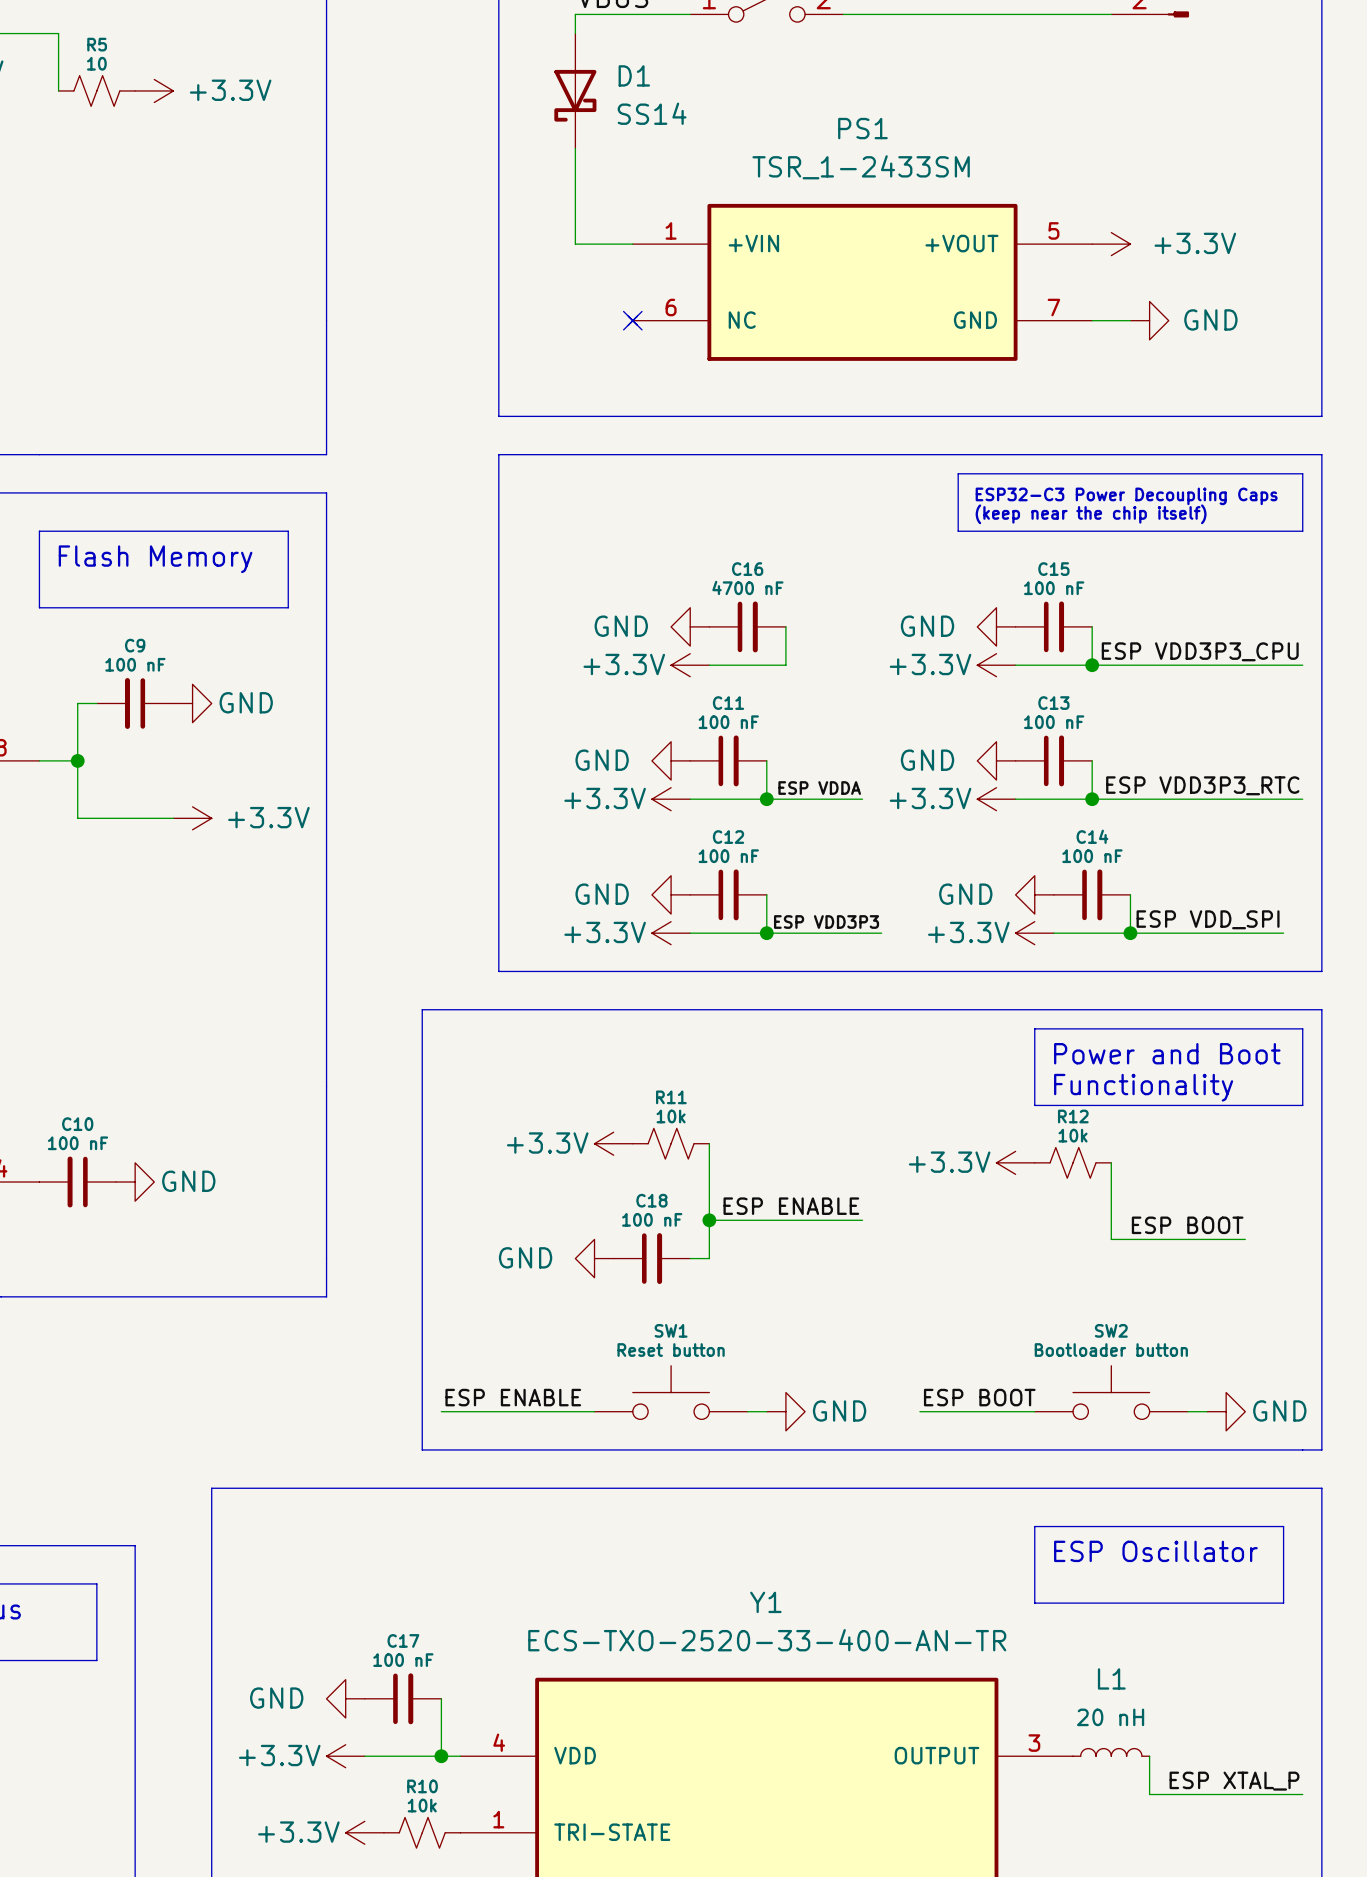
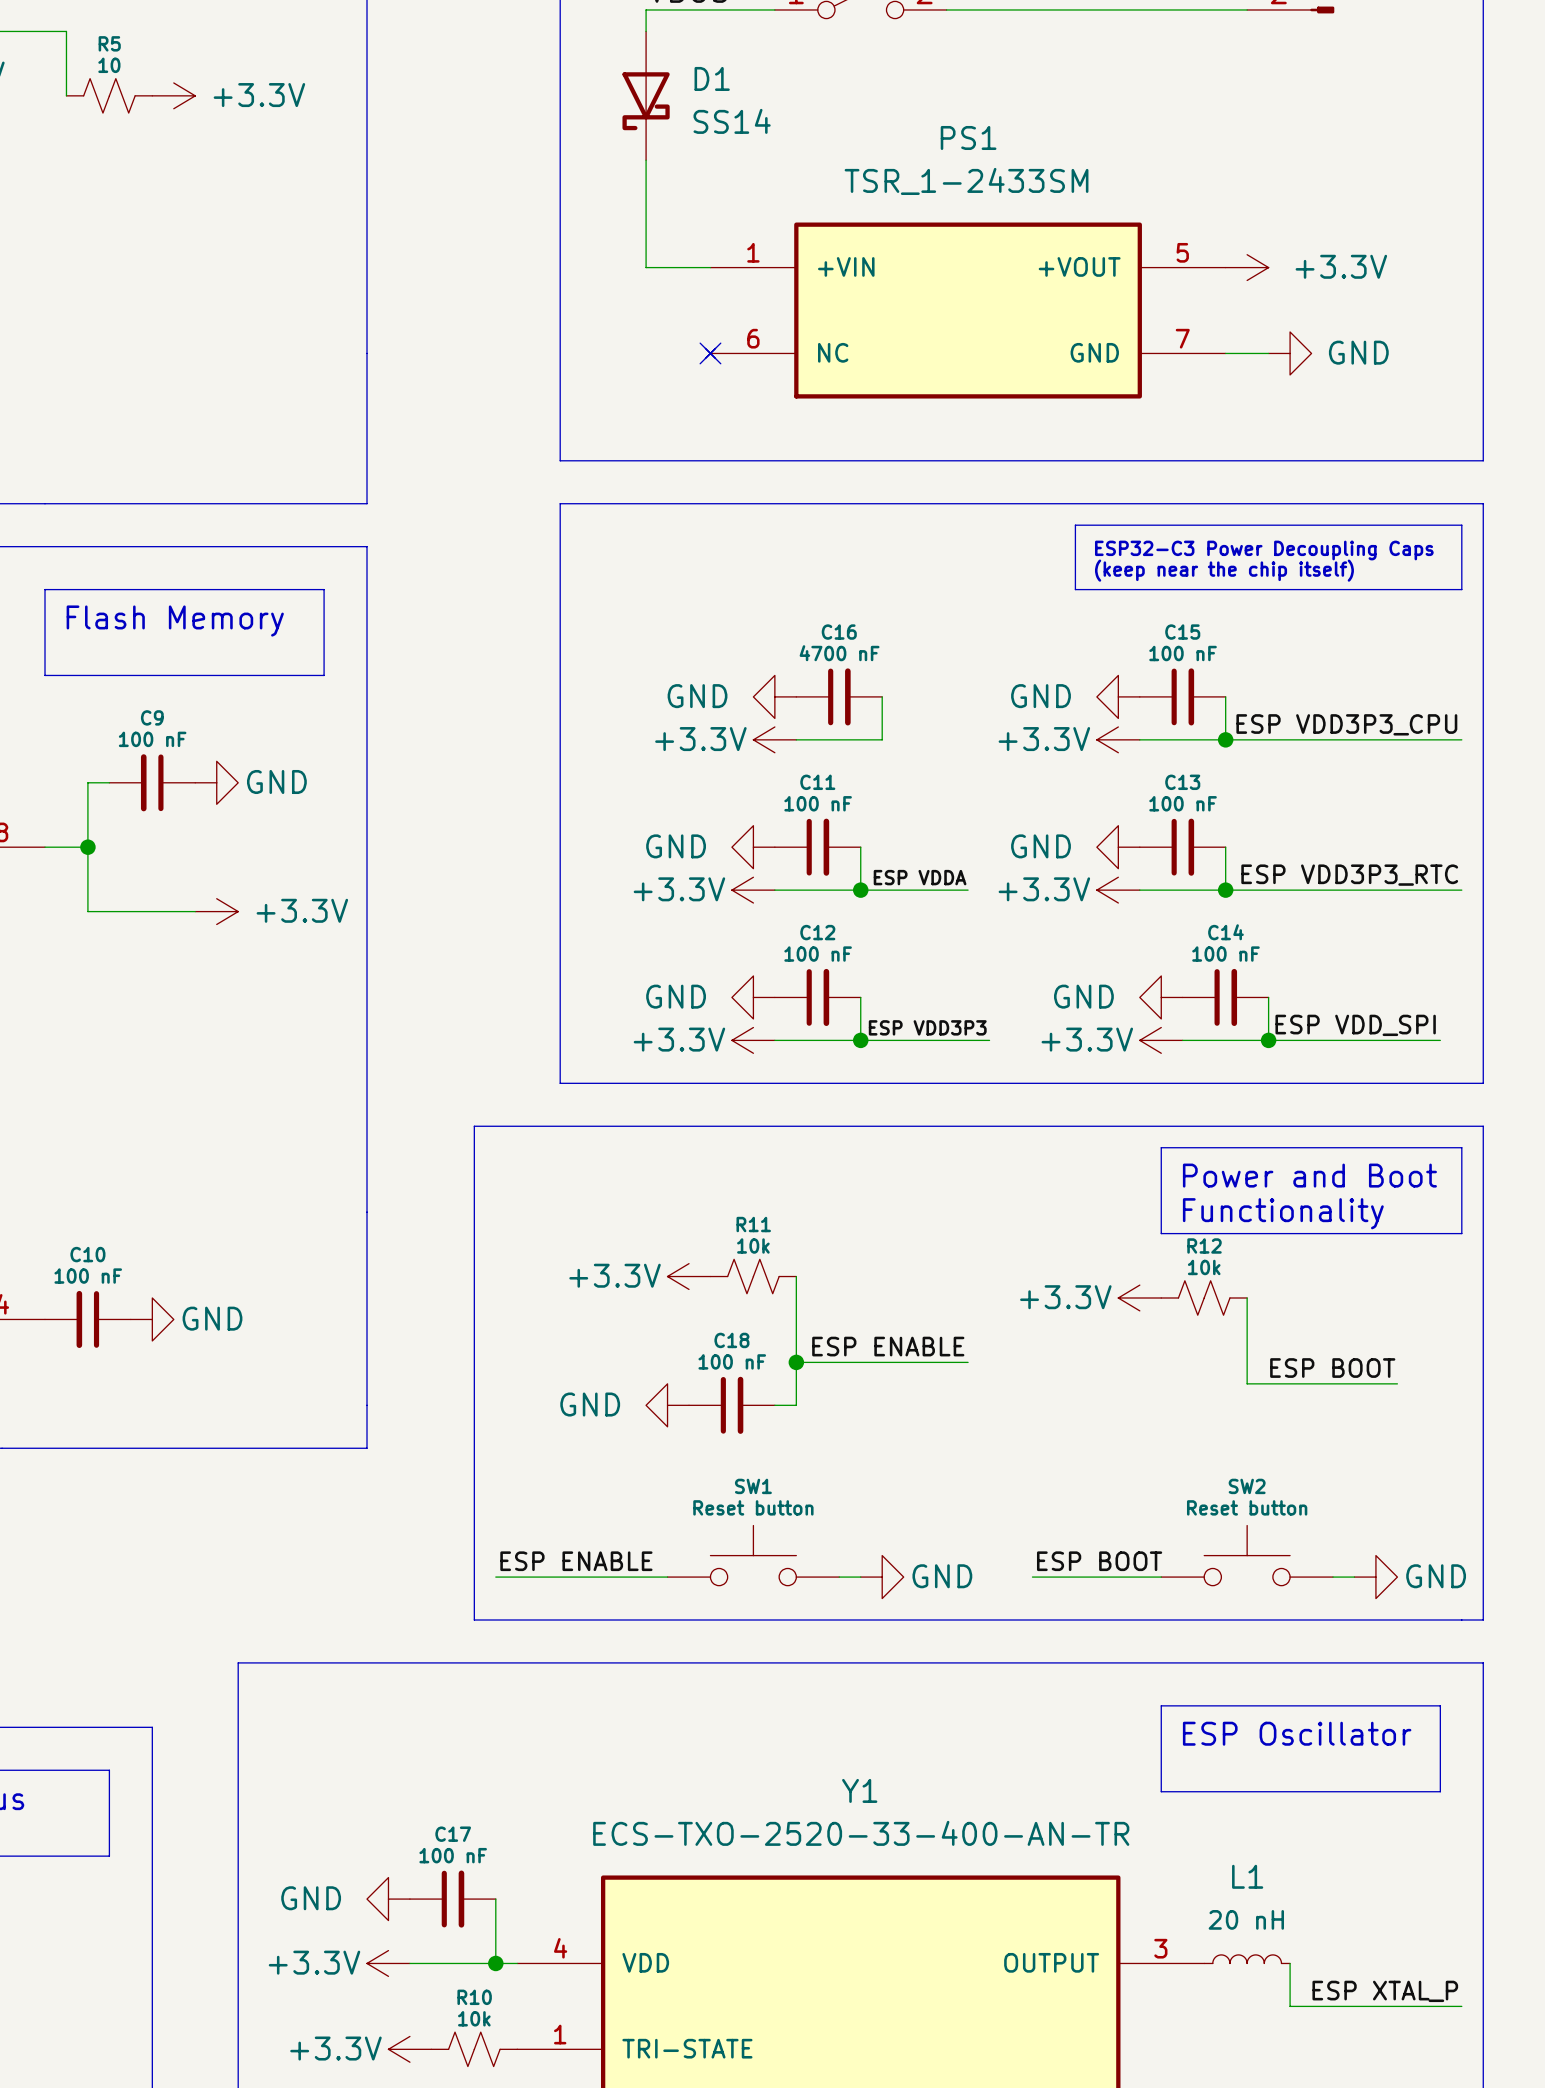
SW2 value: Bootloader button (1111, 1350) -> Reset button (1247, 1507)

